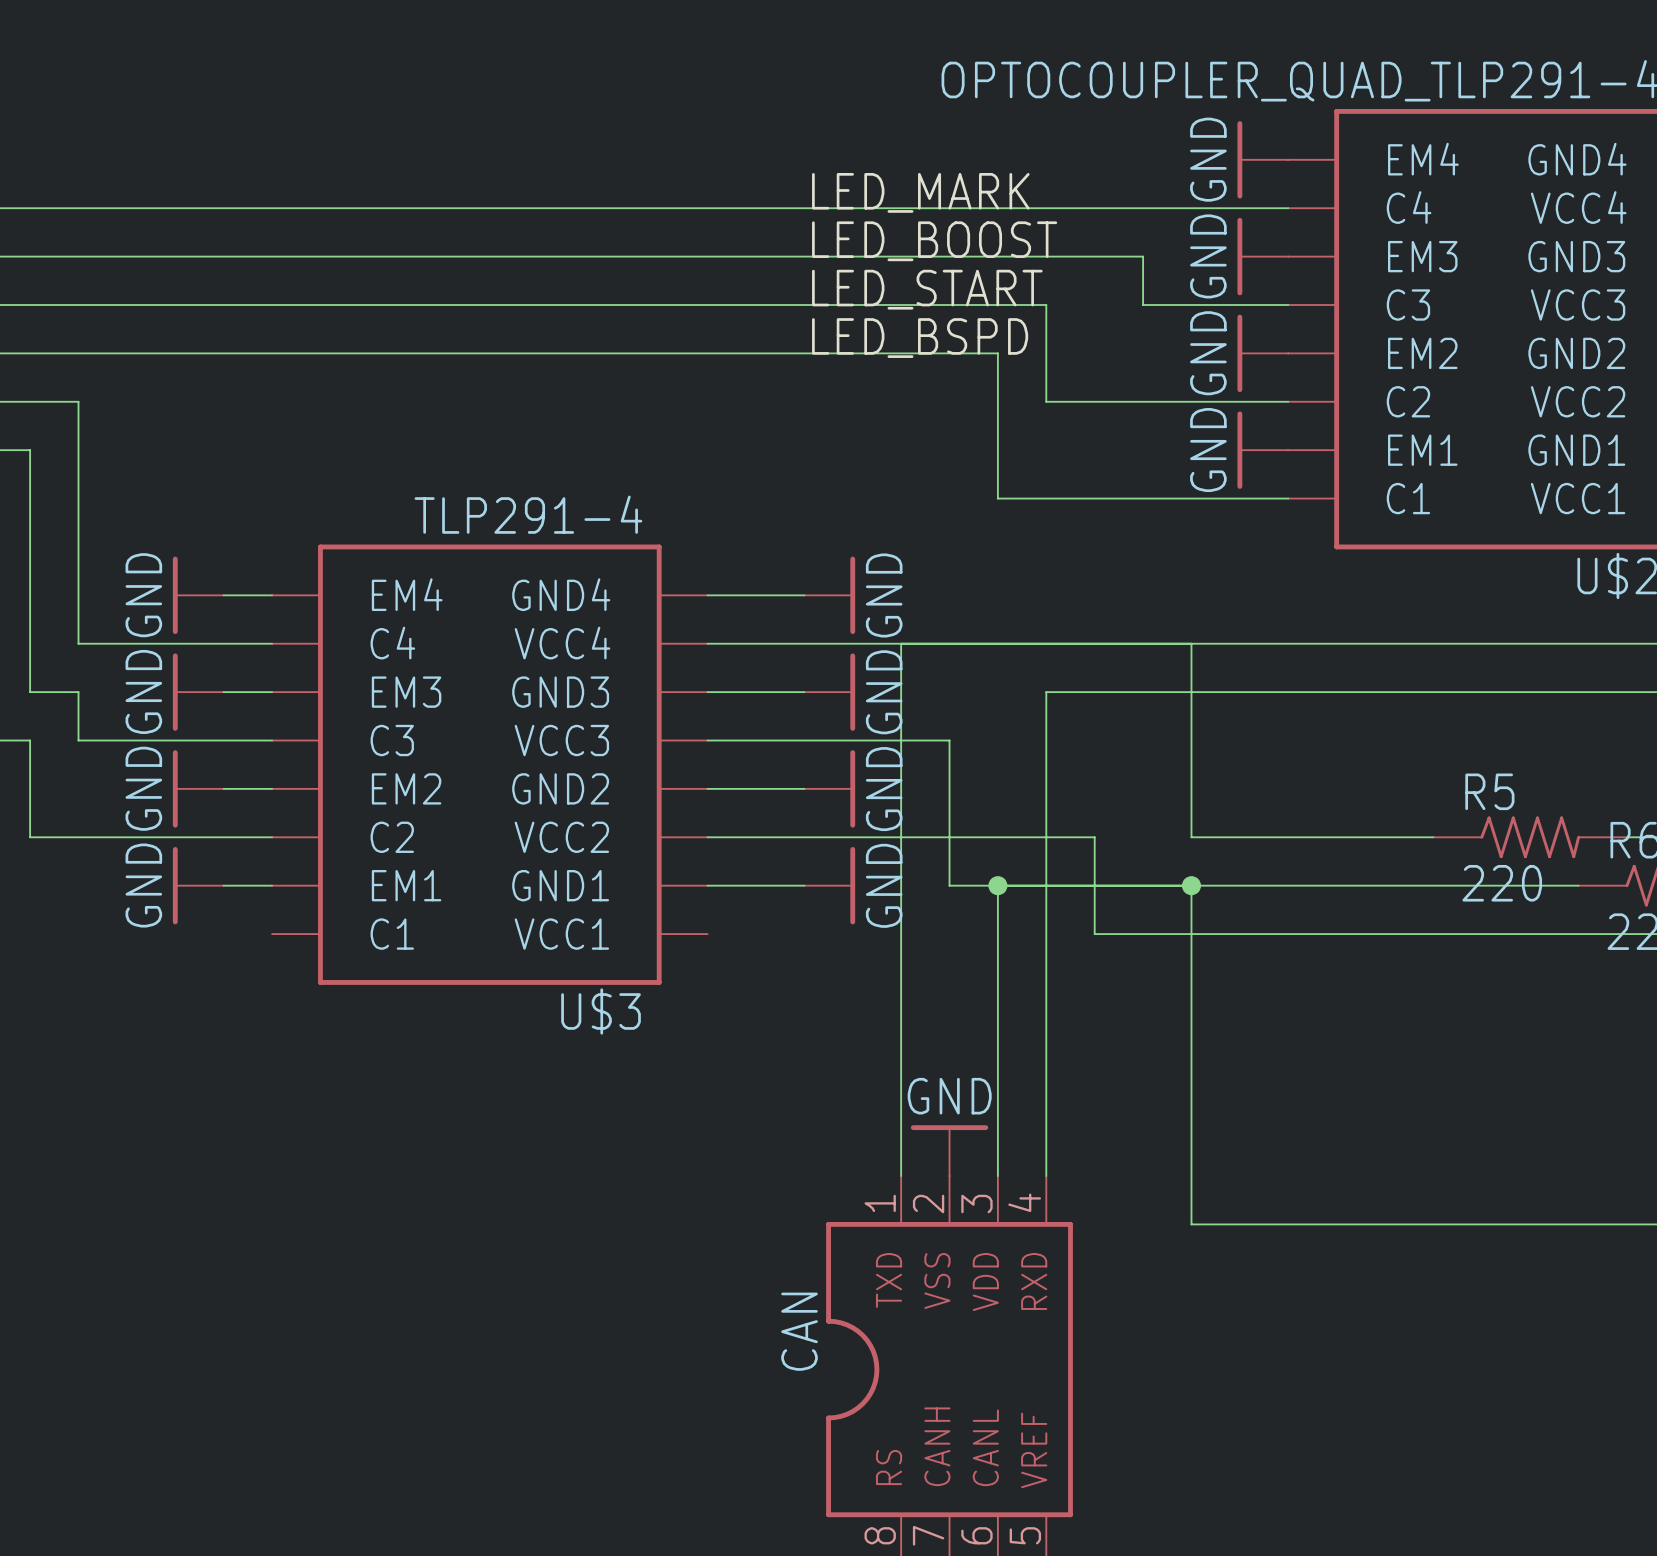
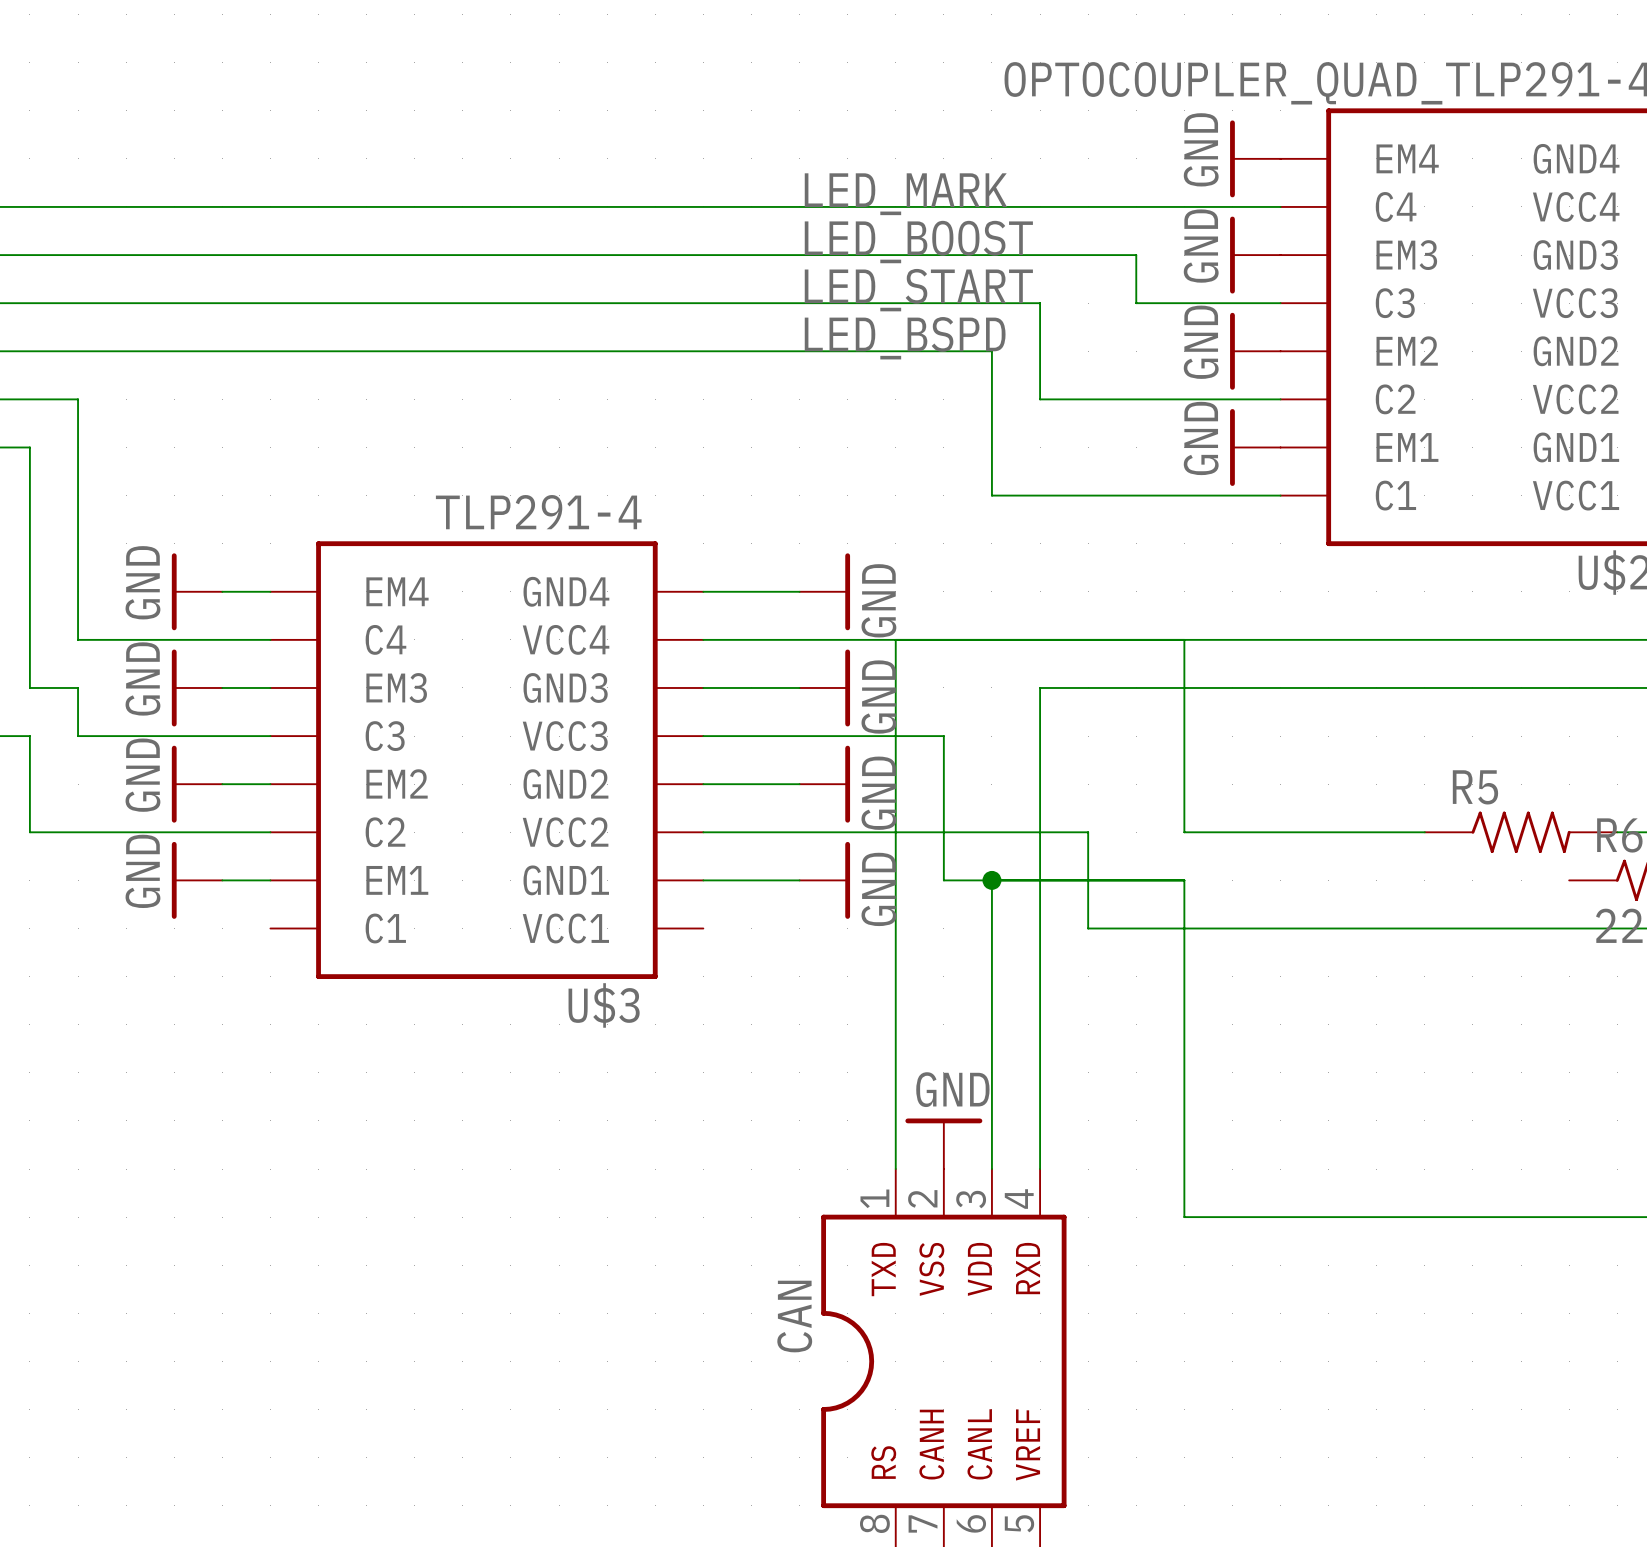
R5 value: 220 (1502, 883) -> none
wire: (1191, 885) (1578, 885) -> none
junction: (1191, 885) -> none

